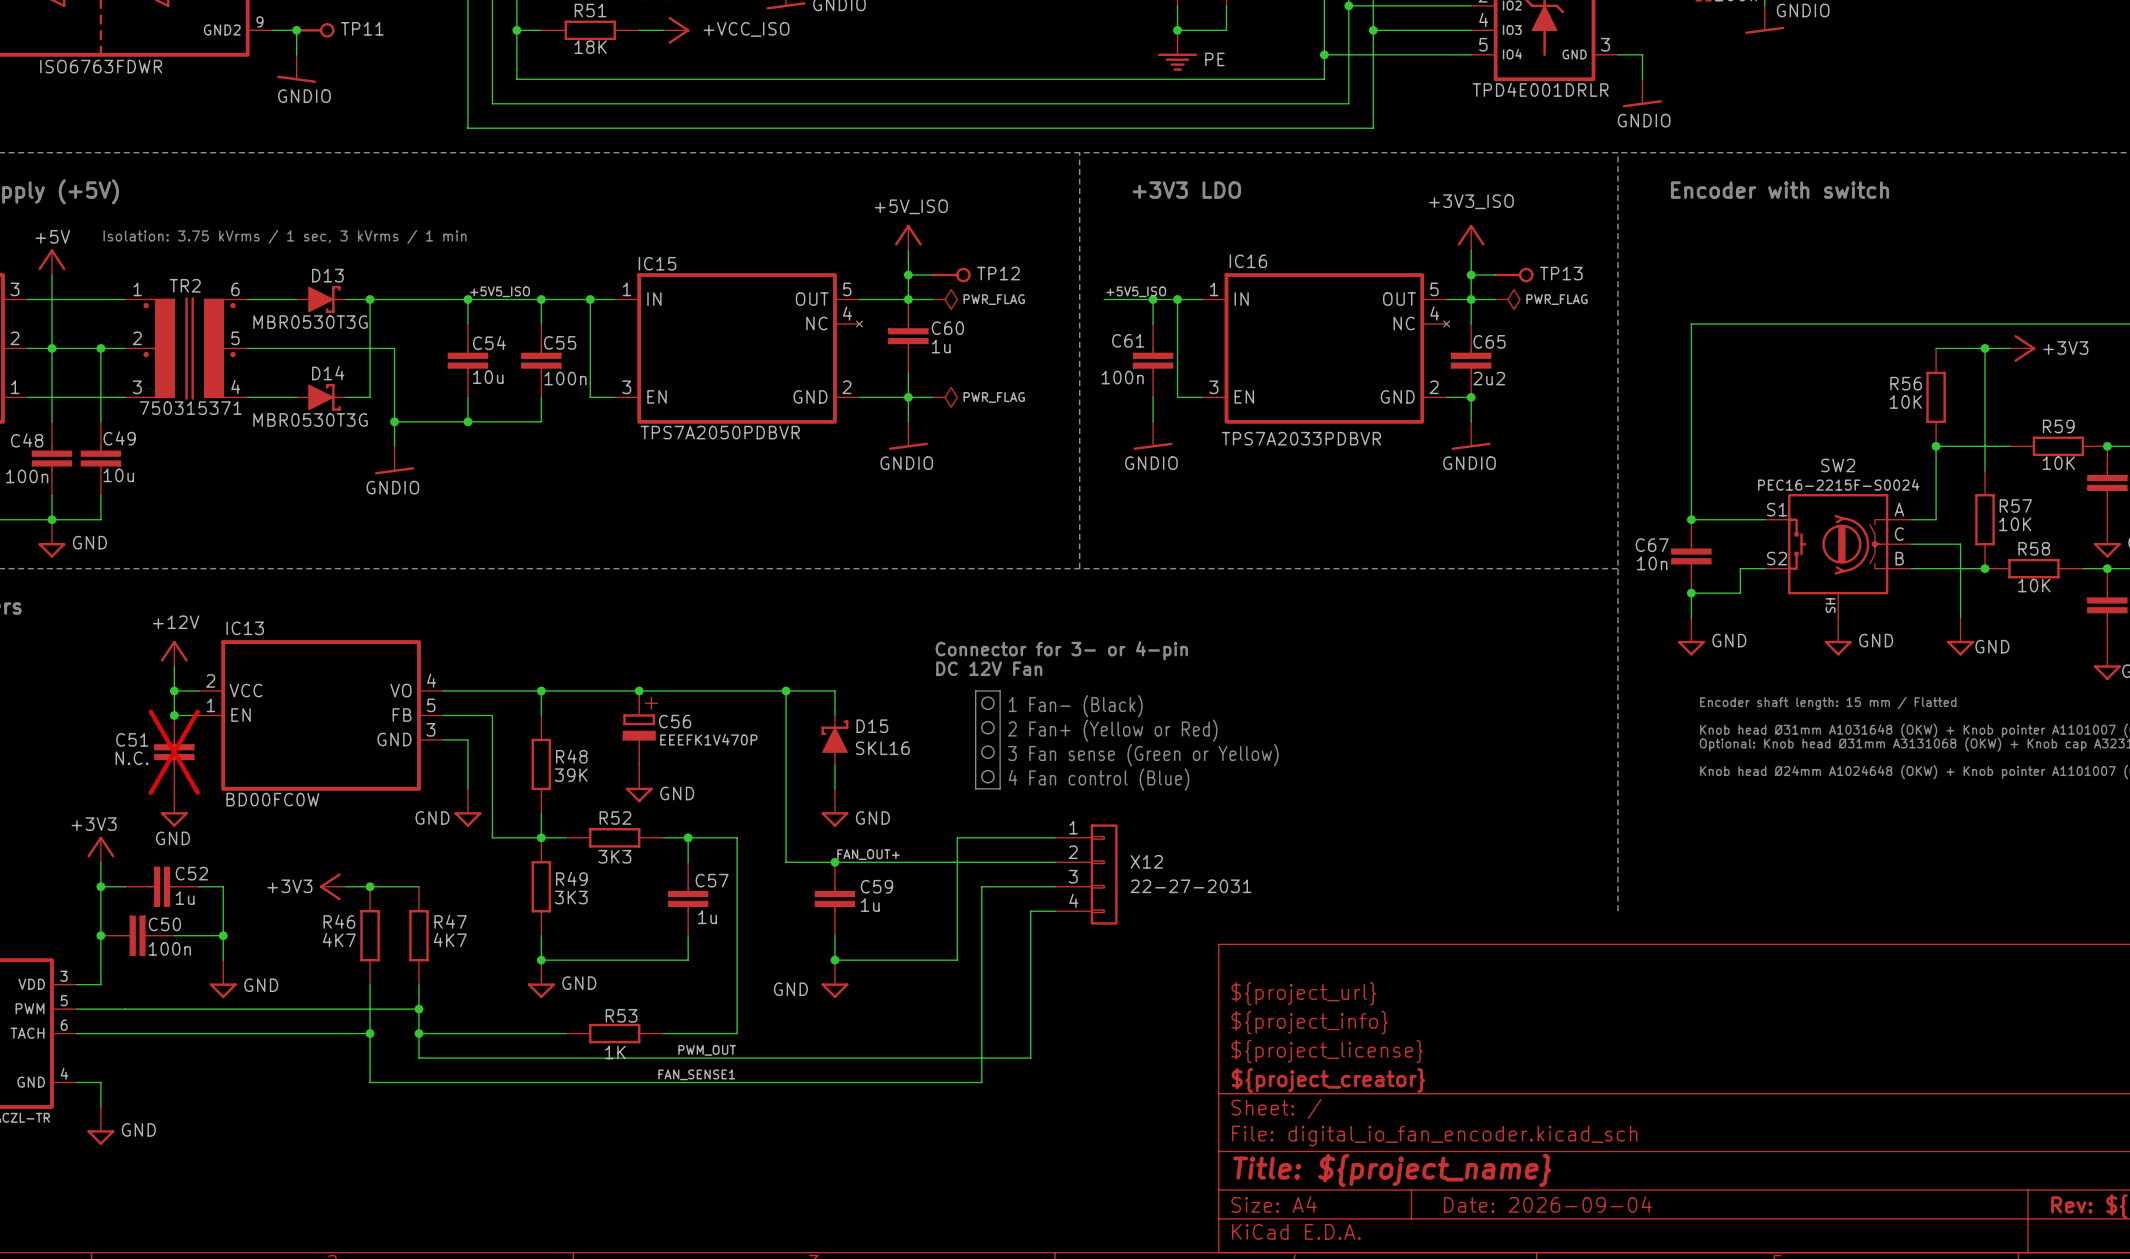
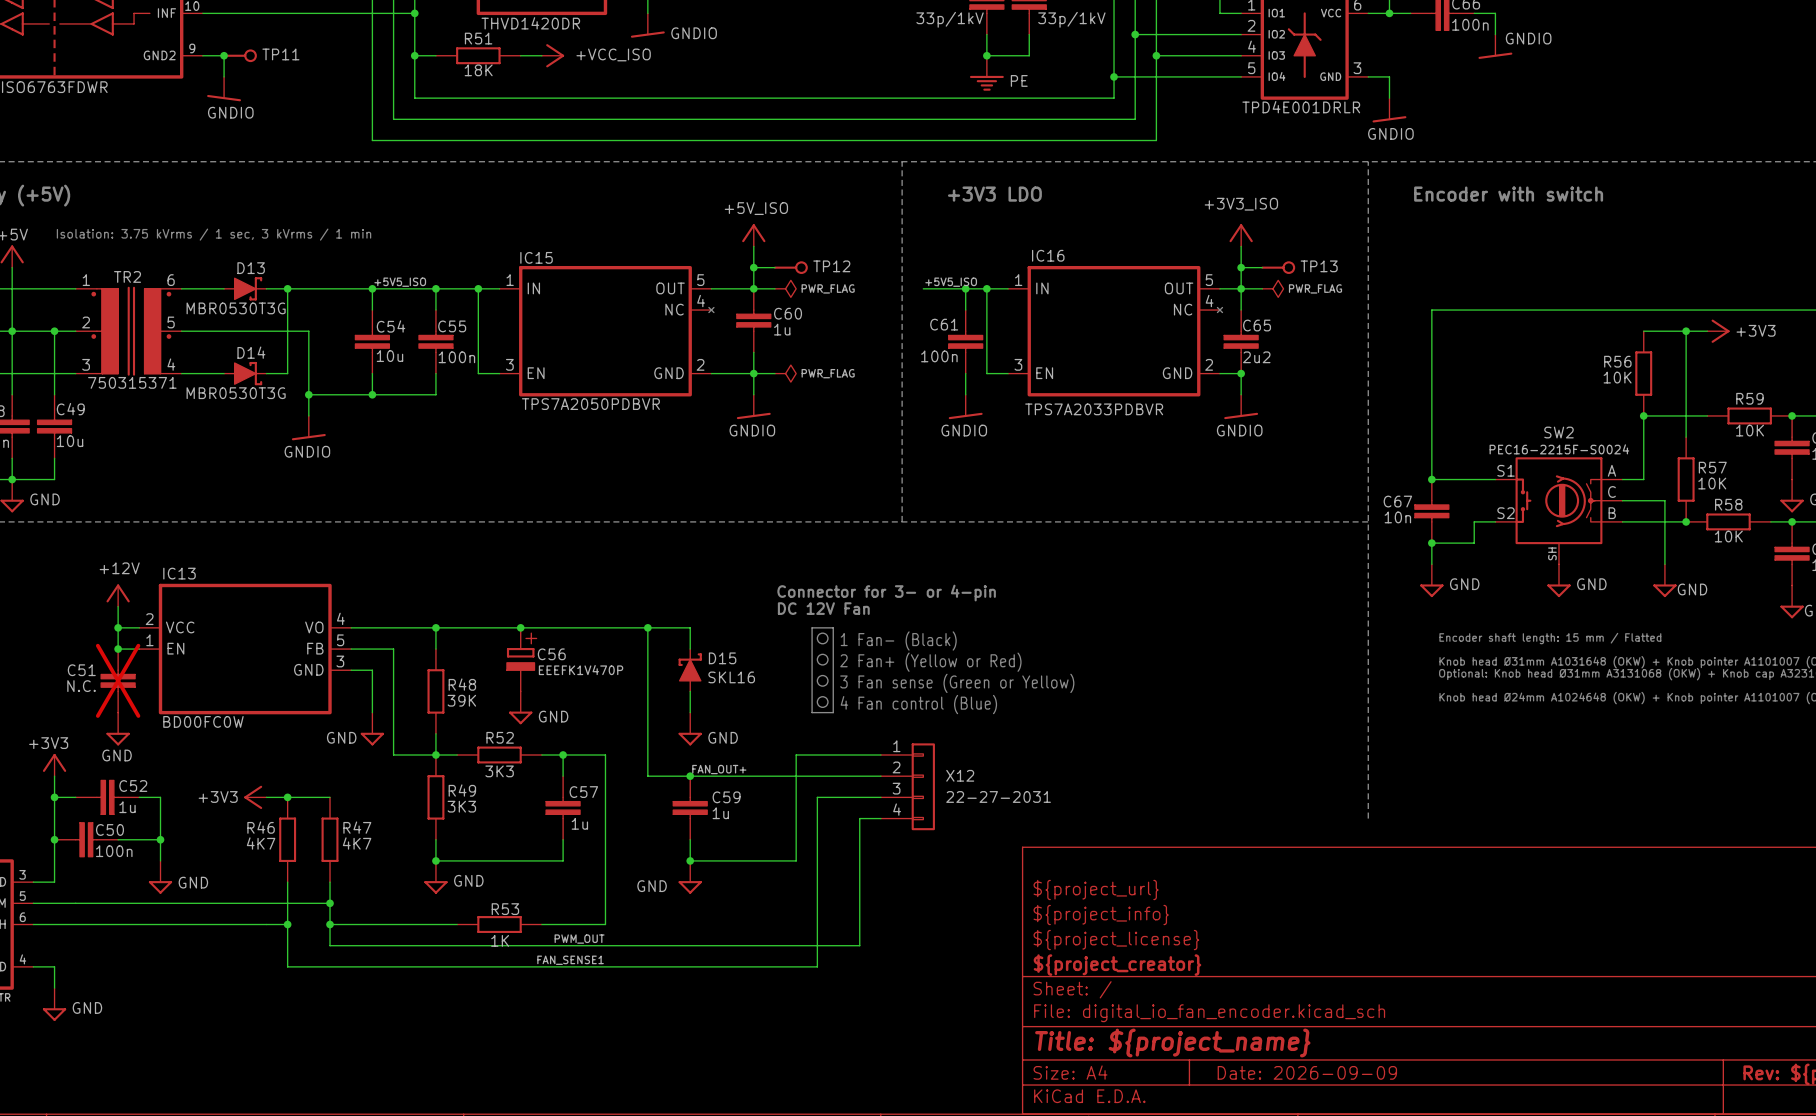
title block: Date: 2026-09-04 (1547, 1204) -> Date: 2026-09-09 (1307, 1072)

